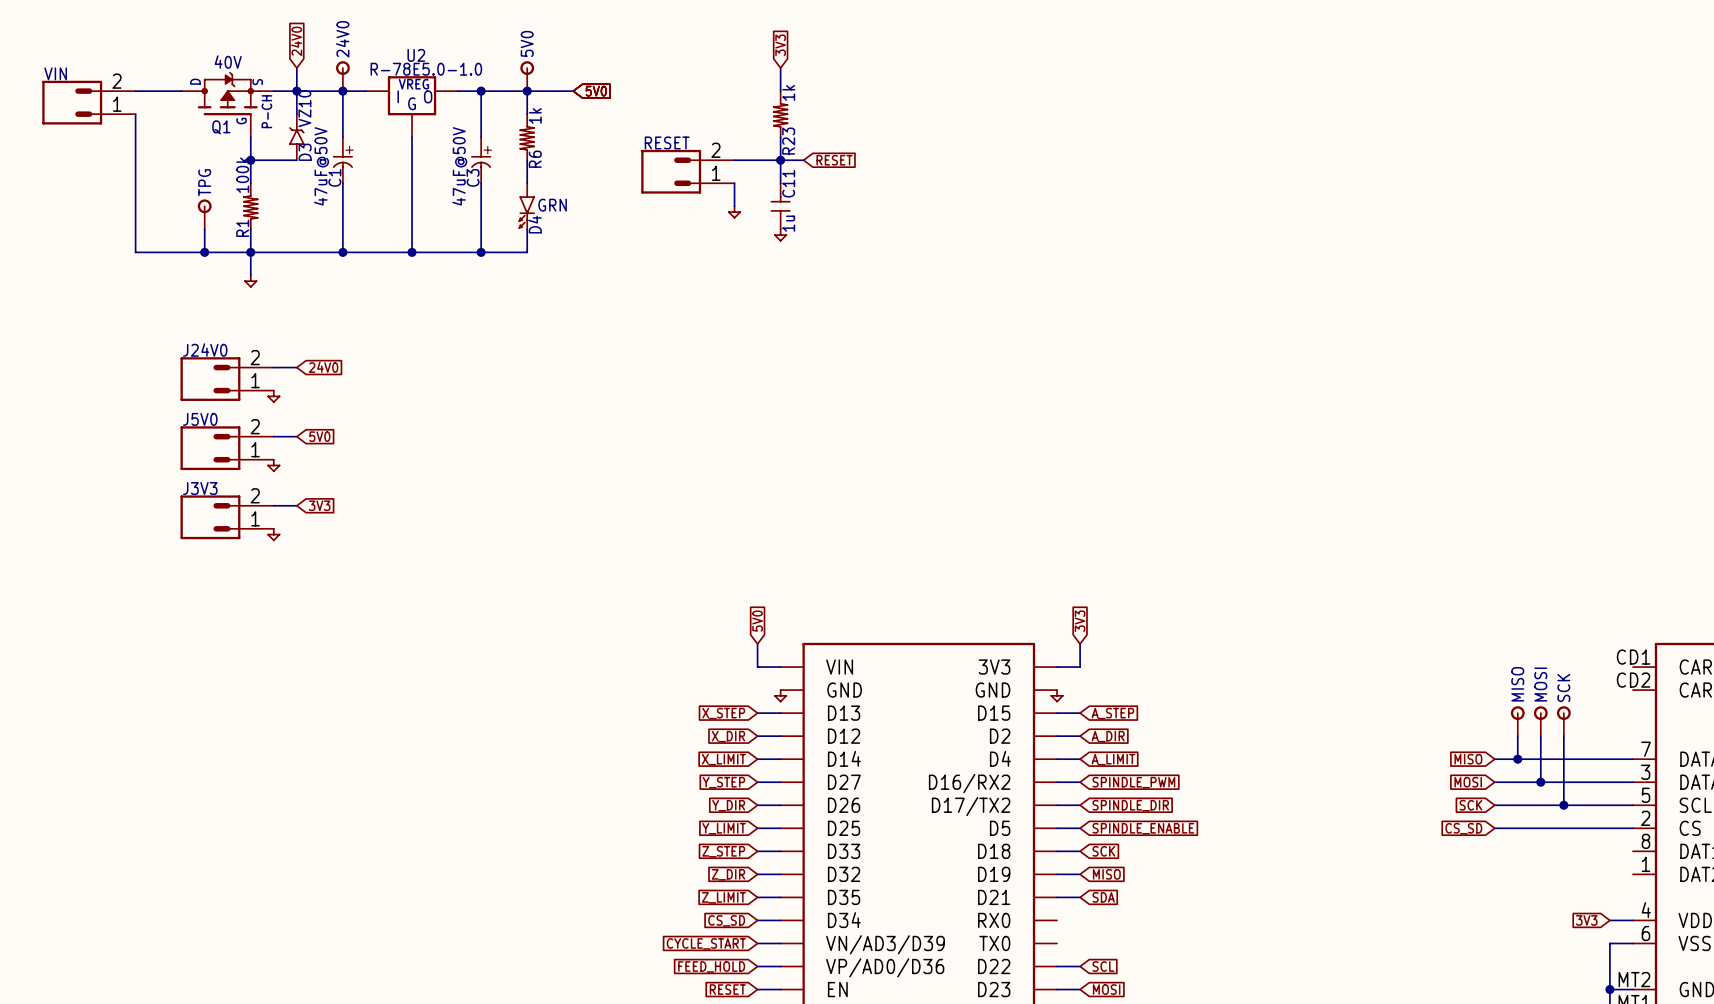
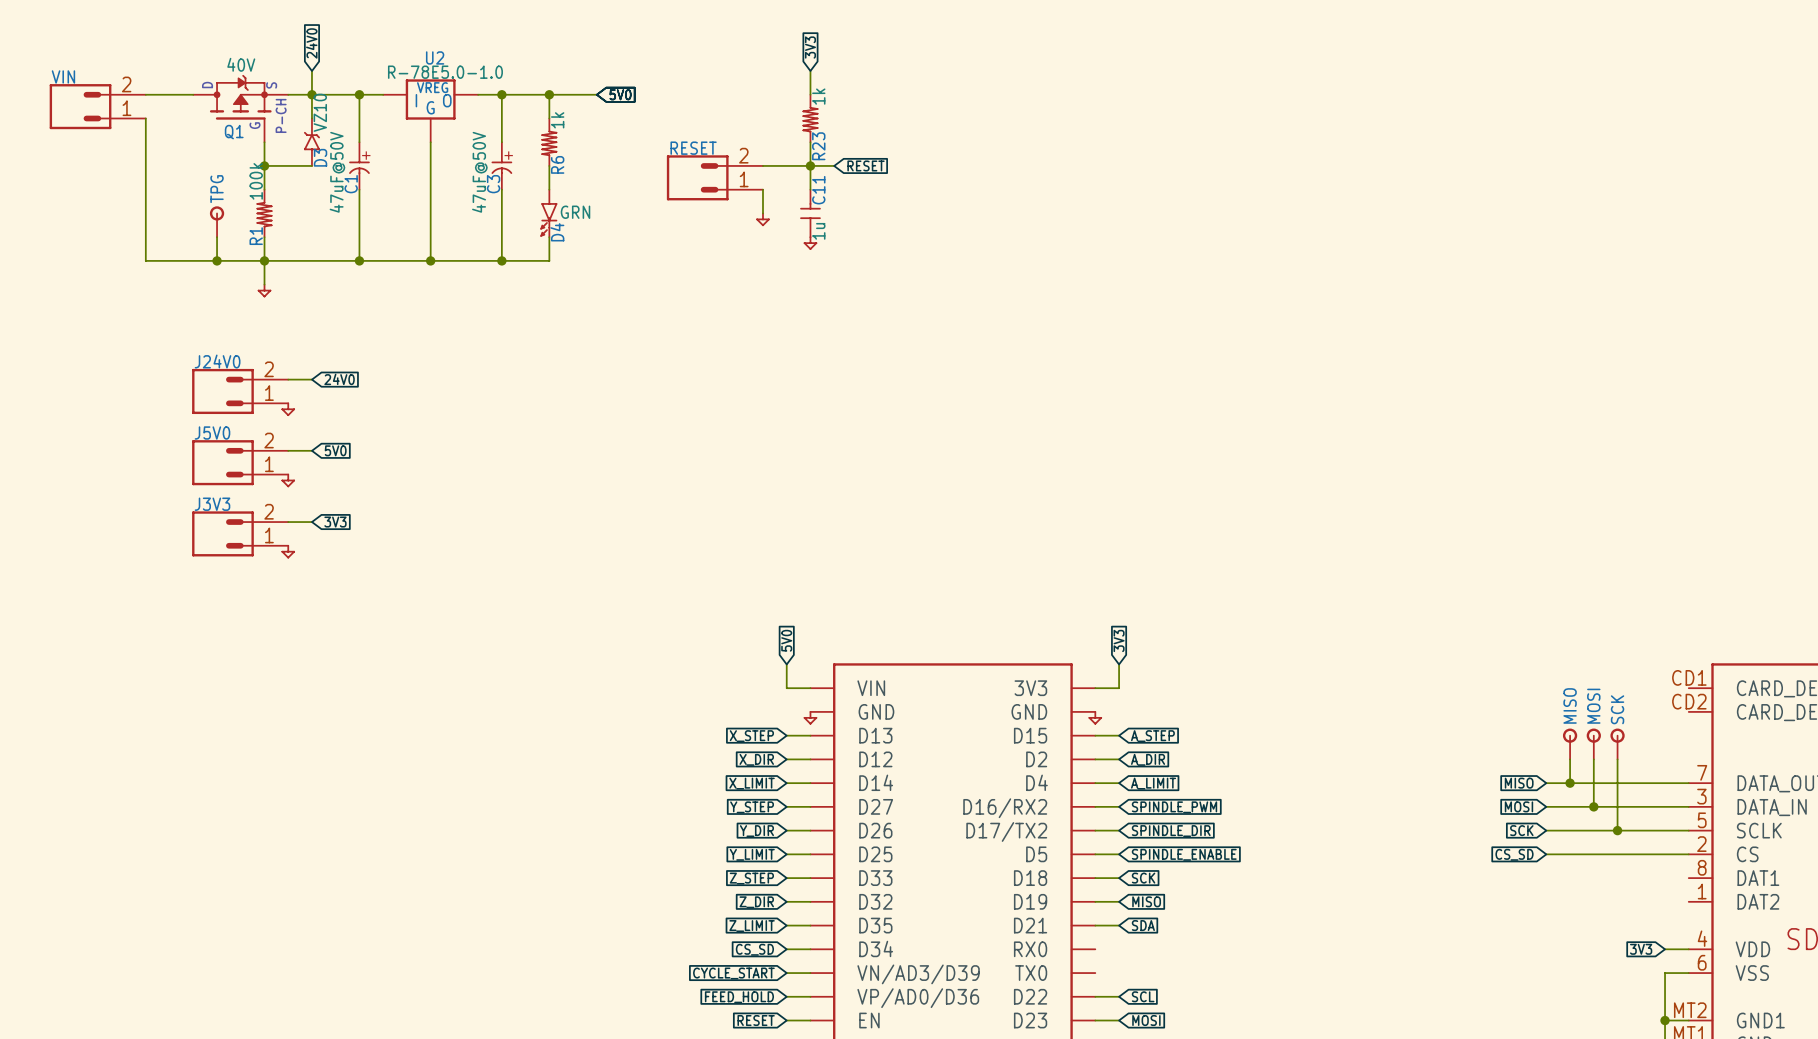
24V0: (342, 76) -> none
5V0: (527, 76) -> none

